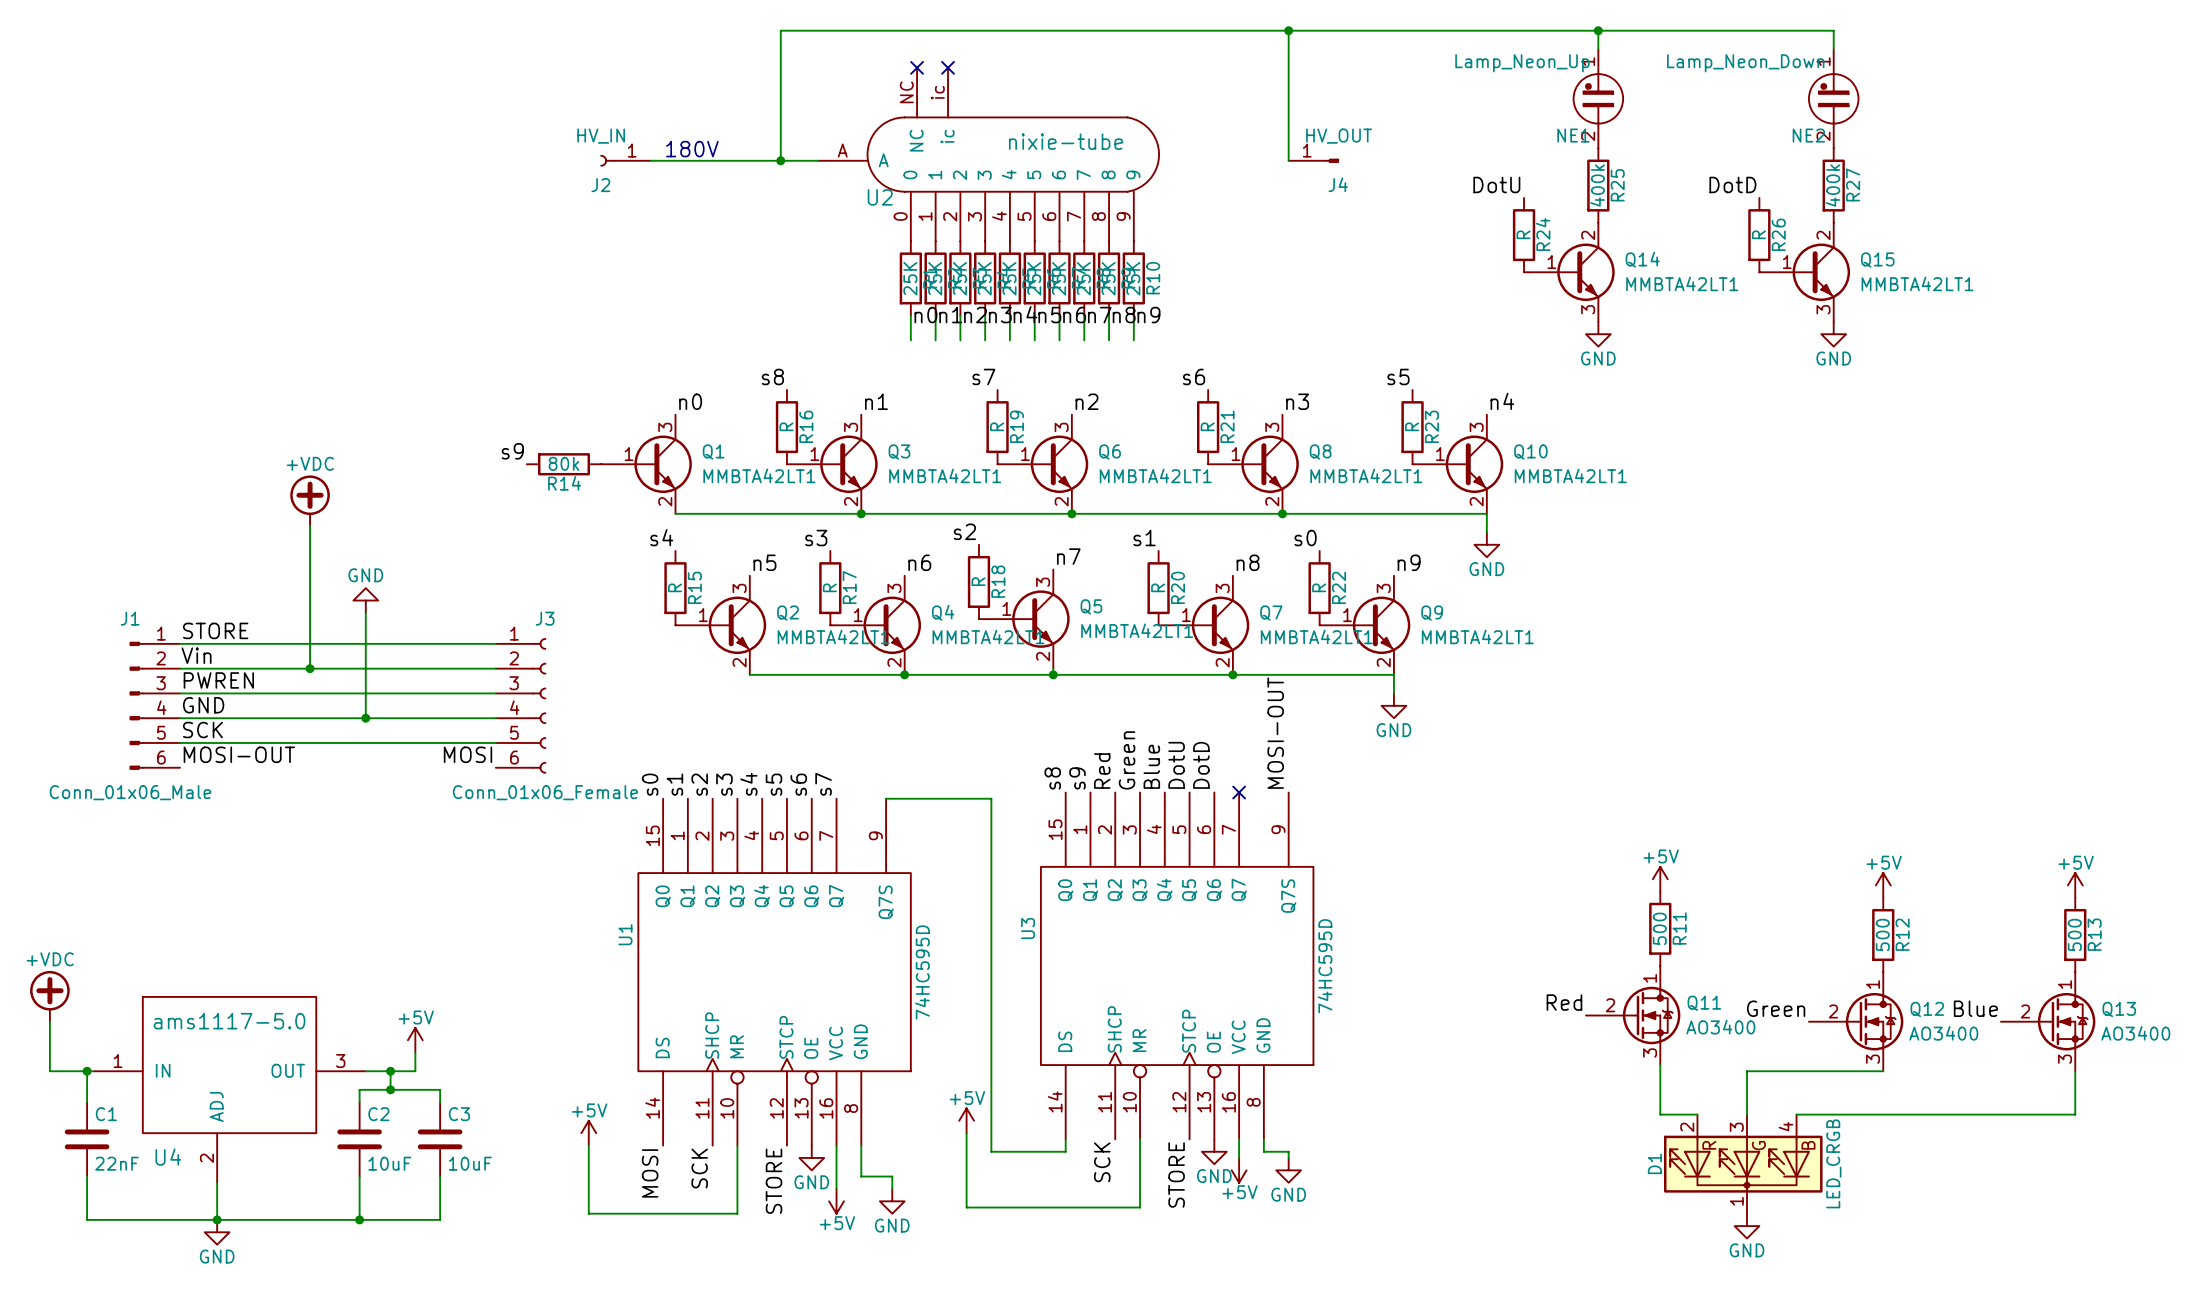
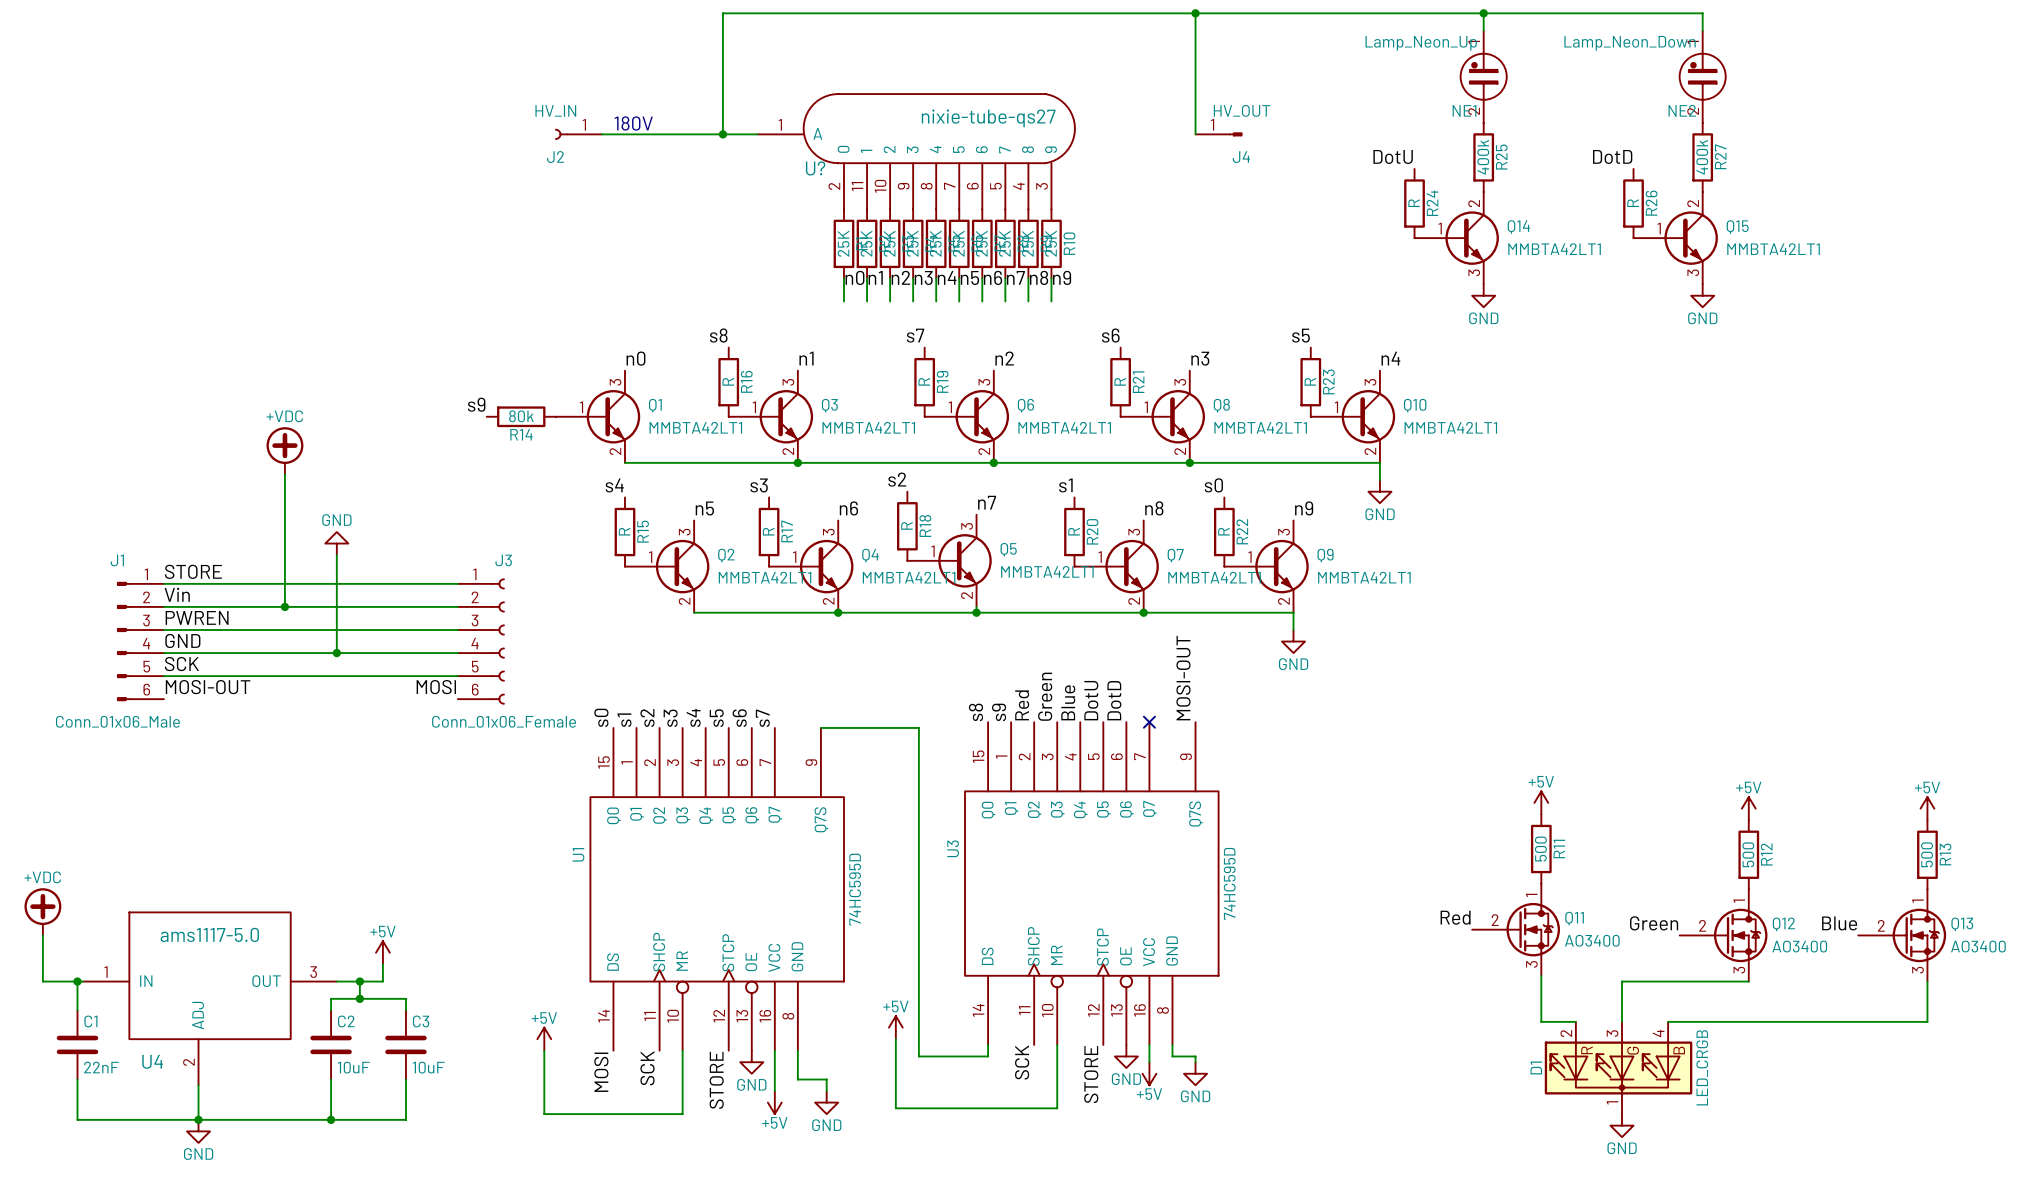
no-connect mark: (917, 67) -> none
no-connect mark: (948, 67) -> none
U2: nixie-tube (988, 154) -> none
U?: none -> nixie-tube-qs27 (916, 151)

